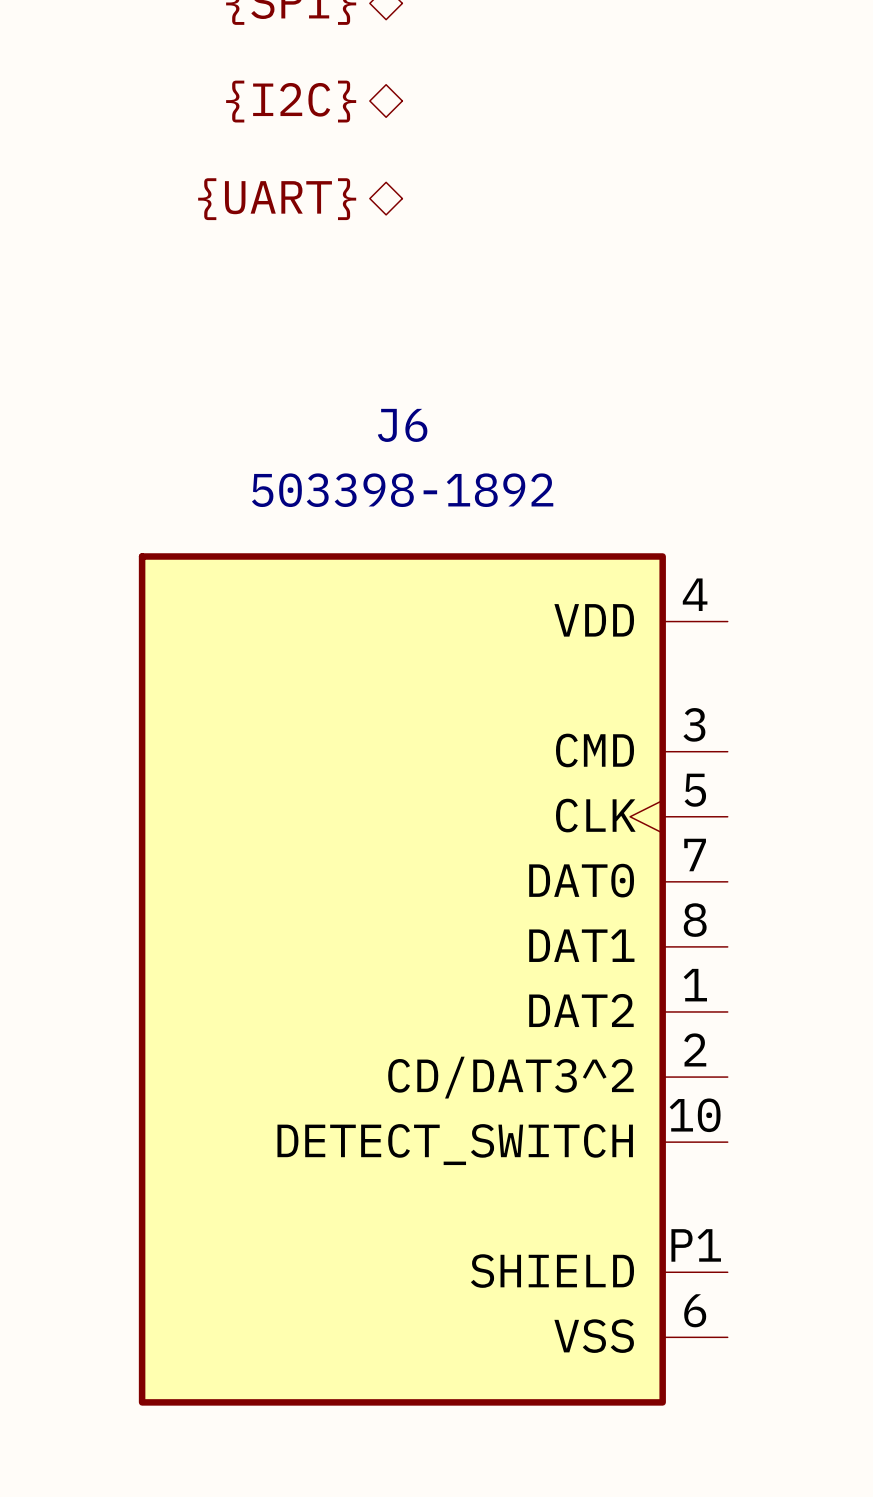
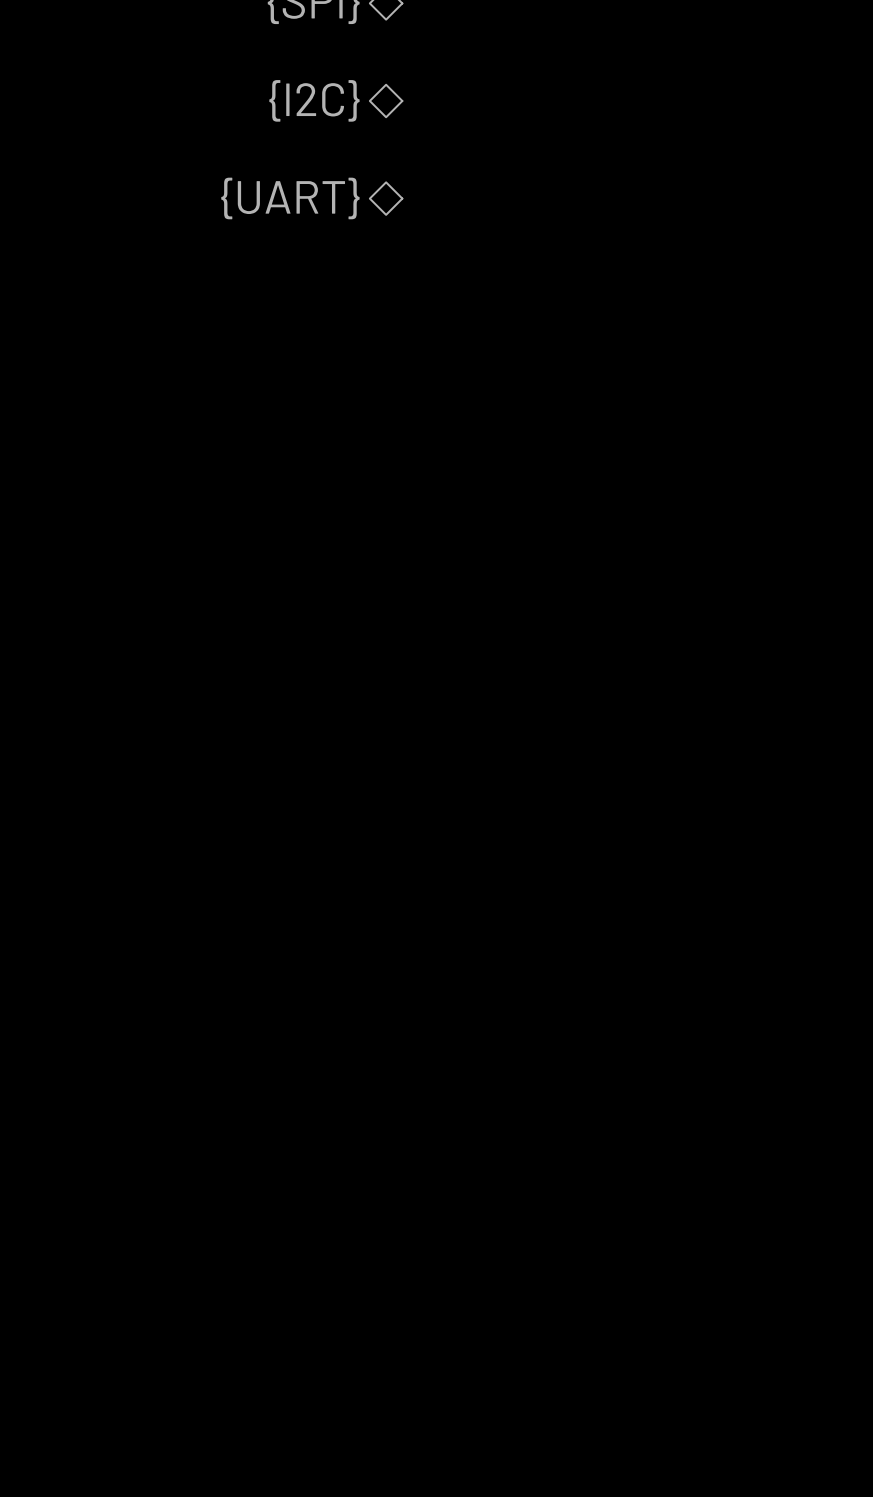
J6: 503398-1892 (433, 979) -> none

